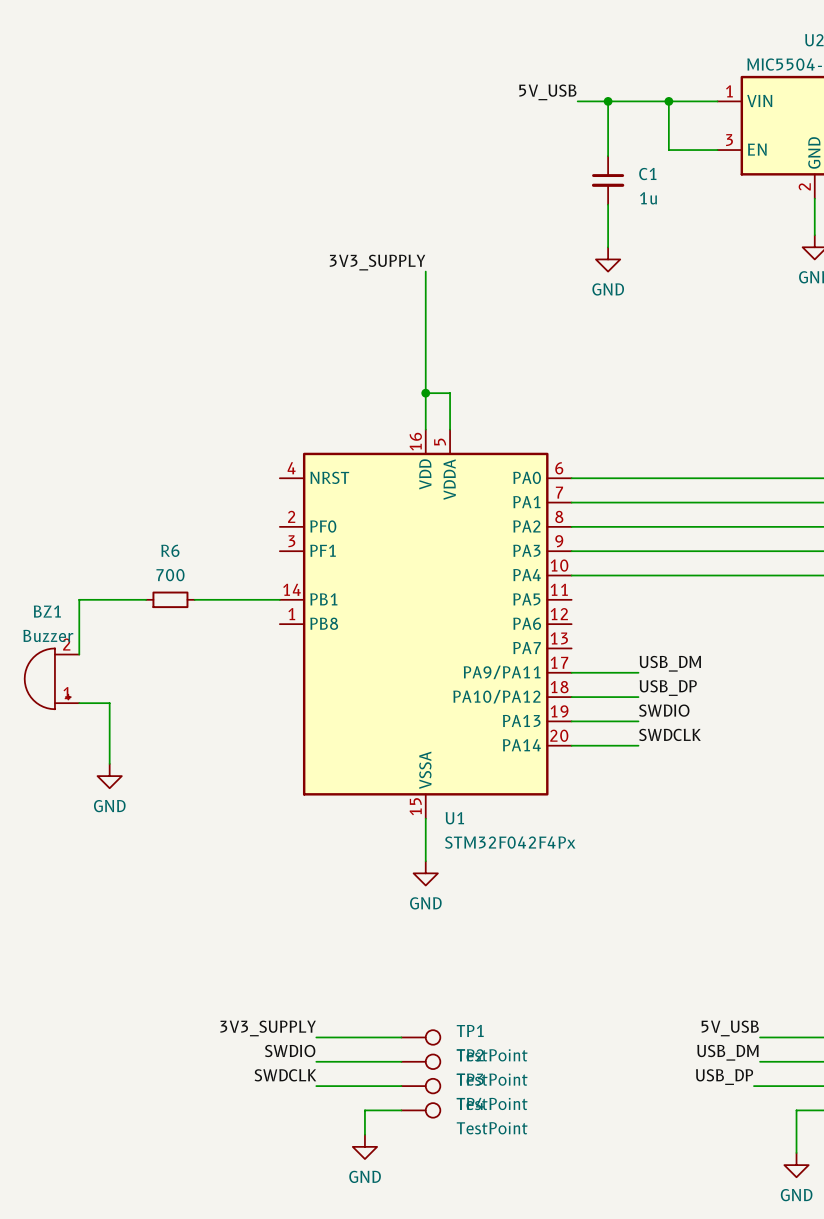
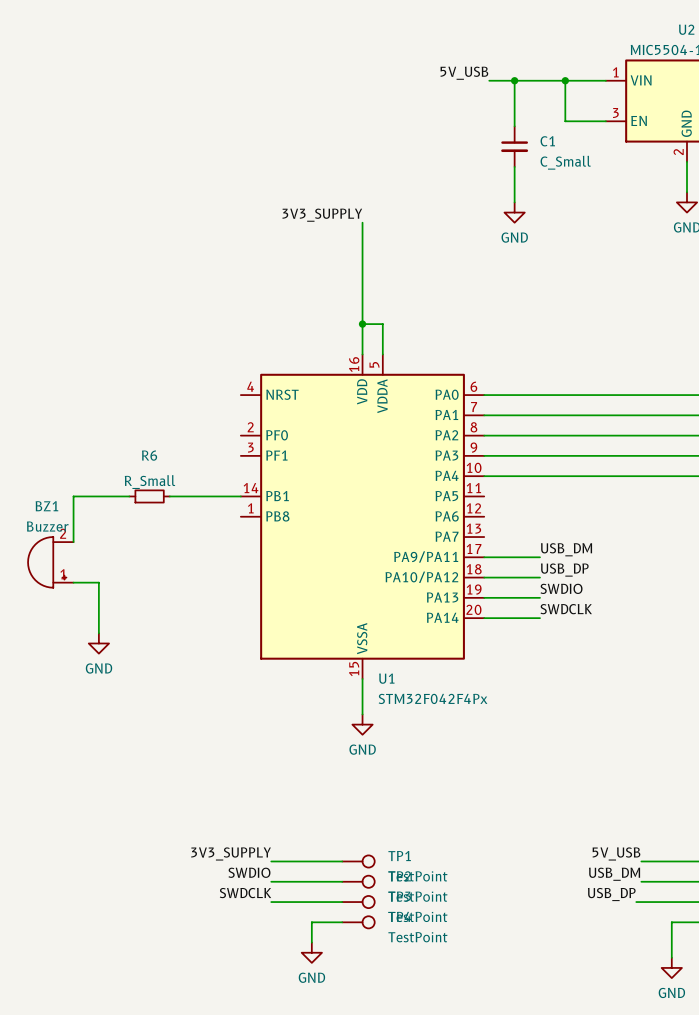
C1 value: 1u (648, 198) -> C_Small (565, 162)
R6 value: 700 (170, 575) -> R_Small (150, 482)

